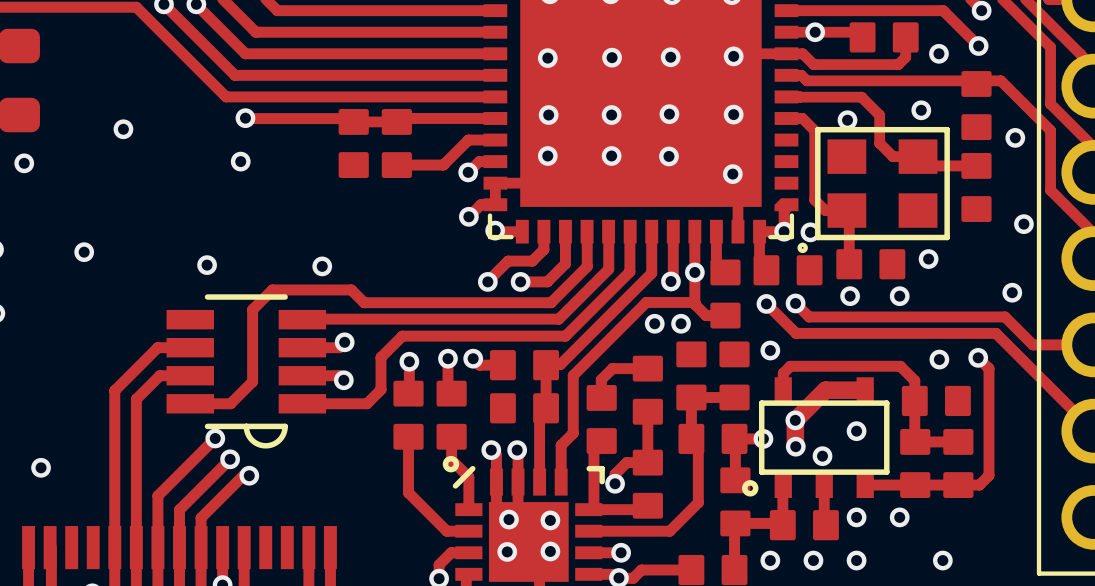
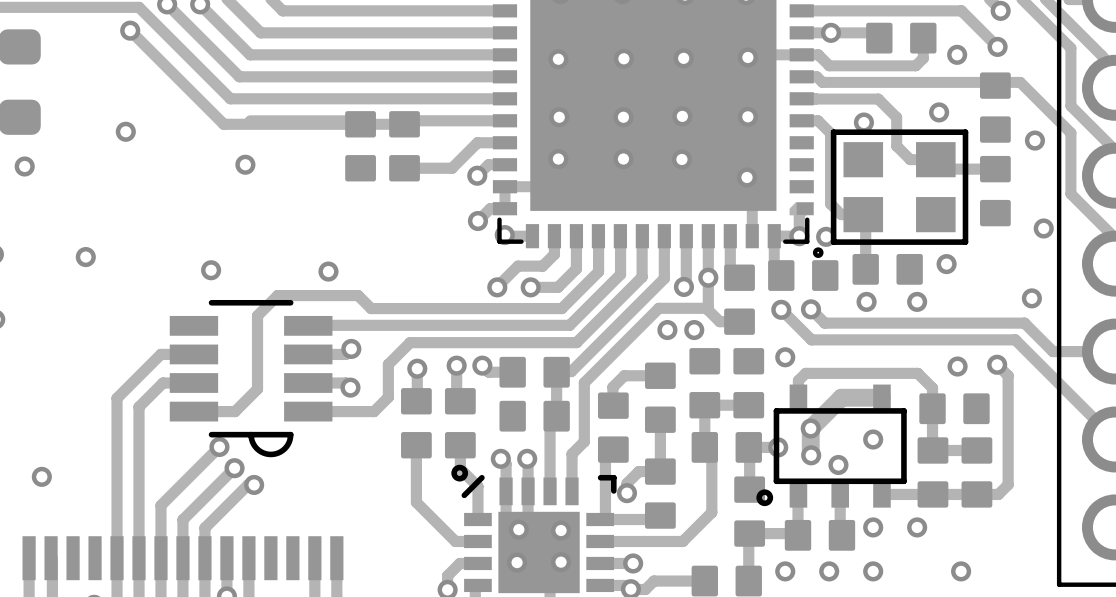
track: none -> (130, 30) (223, 124) (360, 124)
via: none -> (130, 30)
via: (245, 118) -> none

